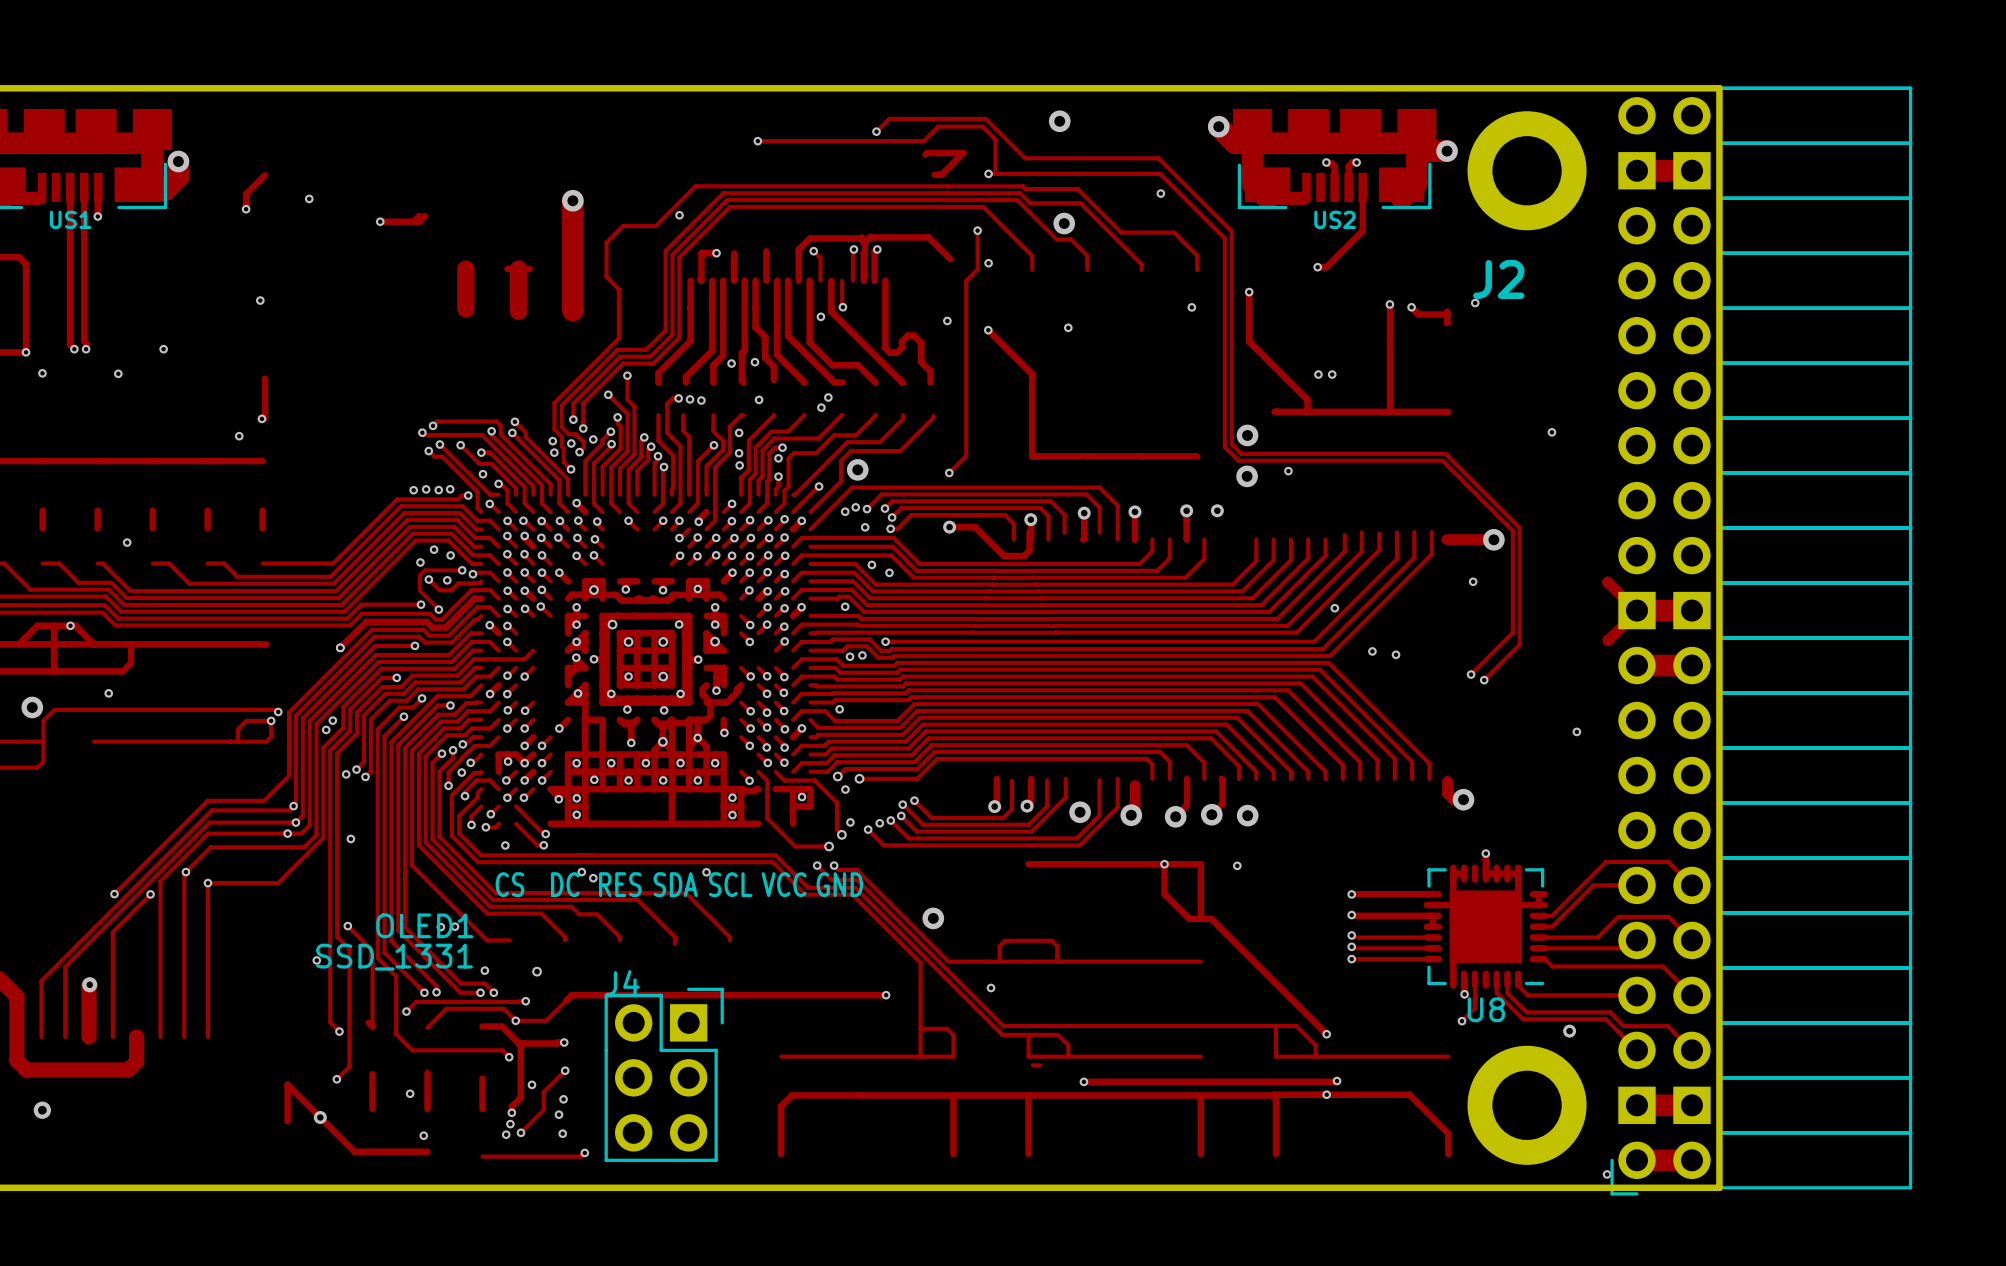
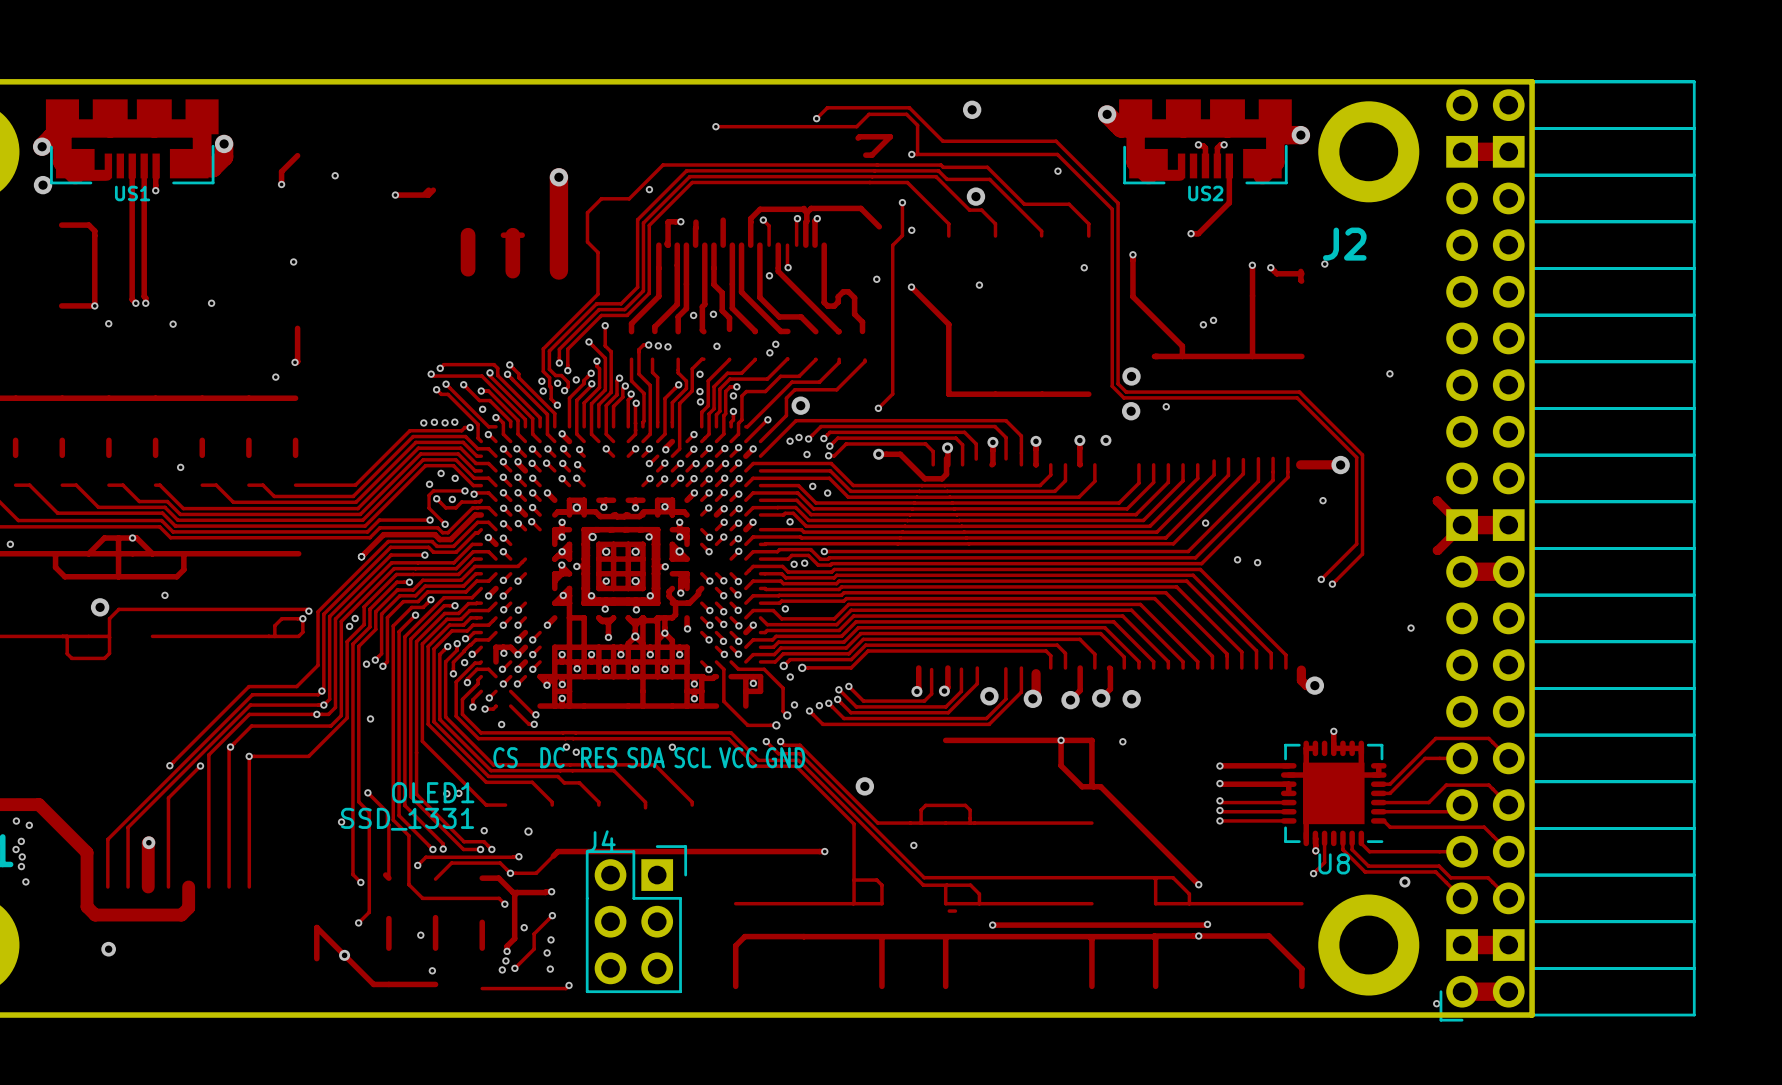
via position: (1318, 374) -> (1213, 320)

